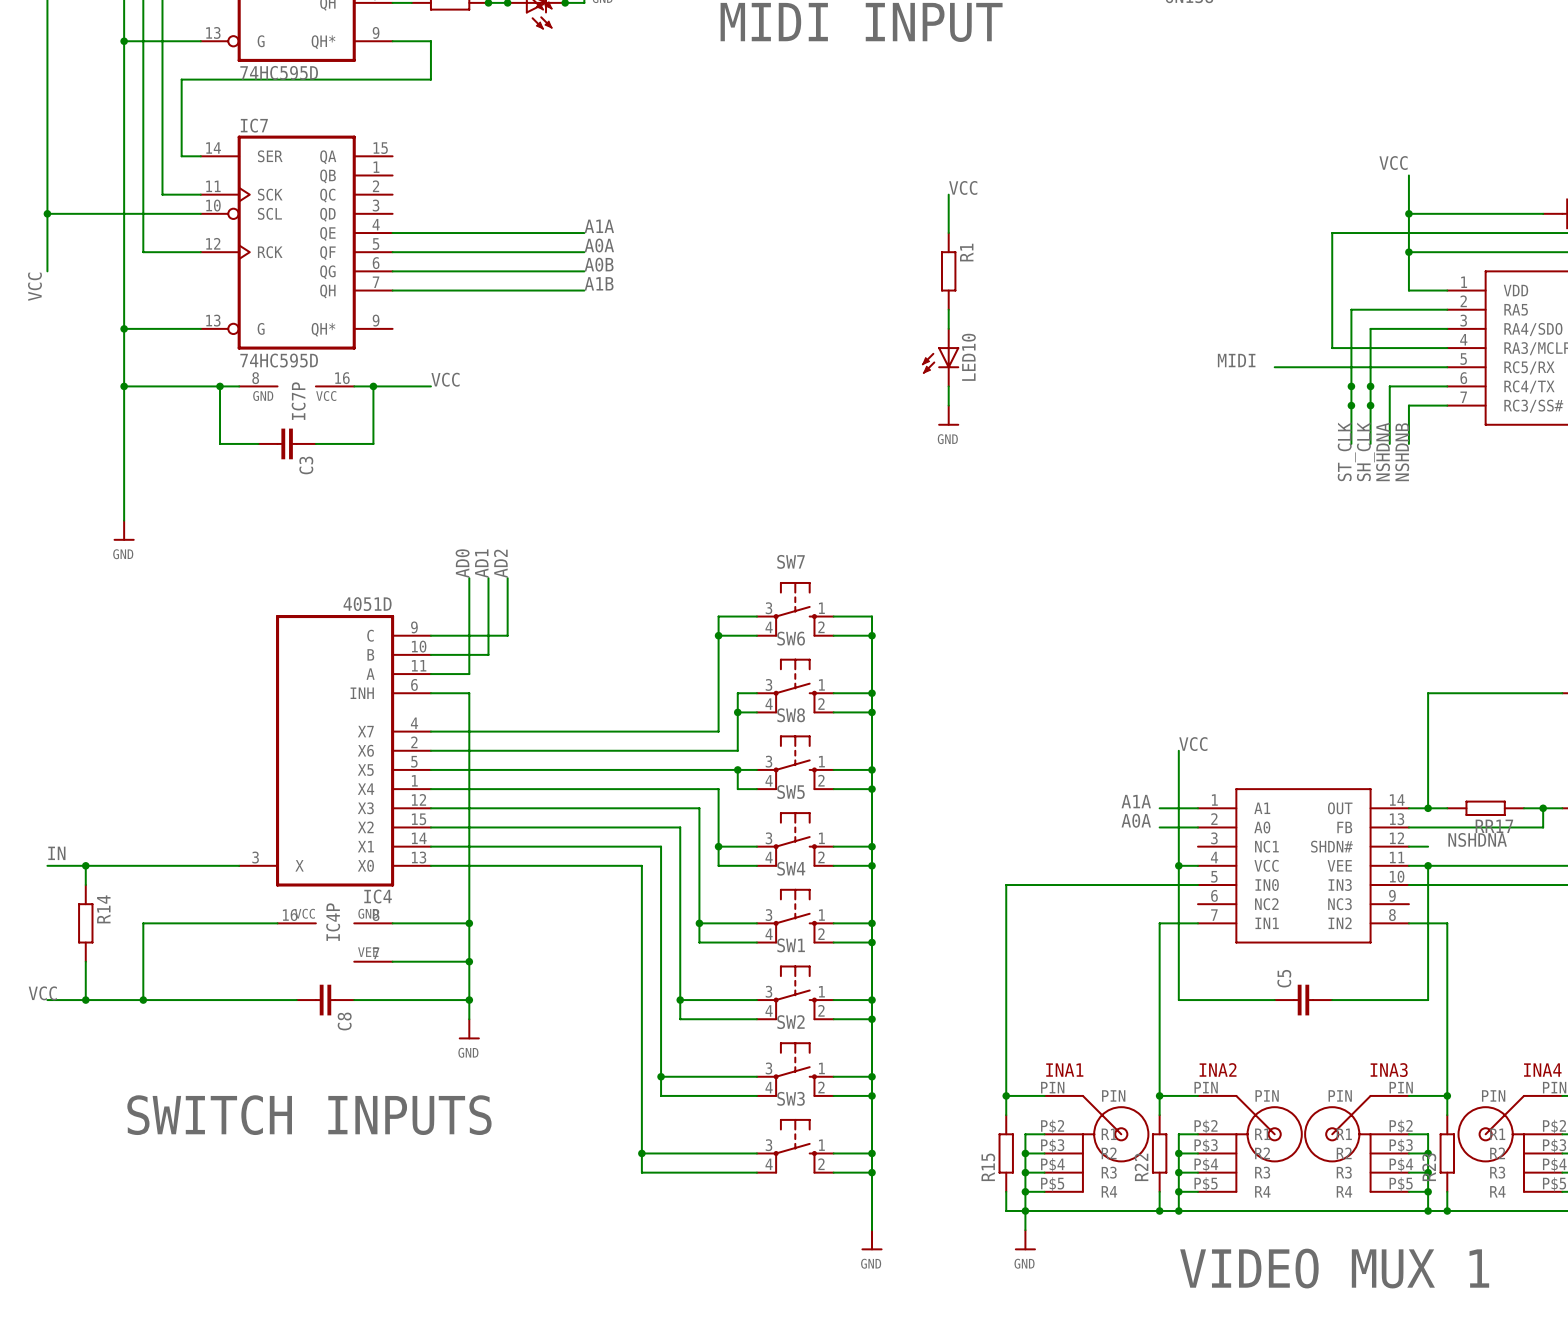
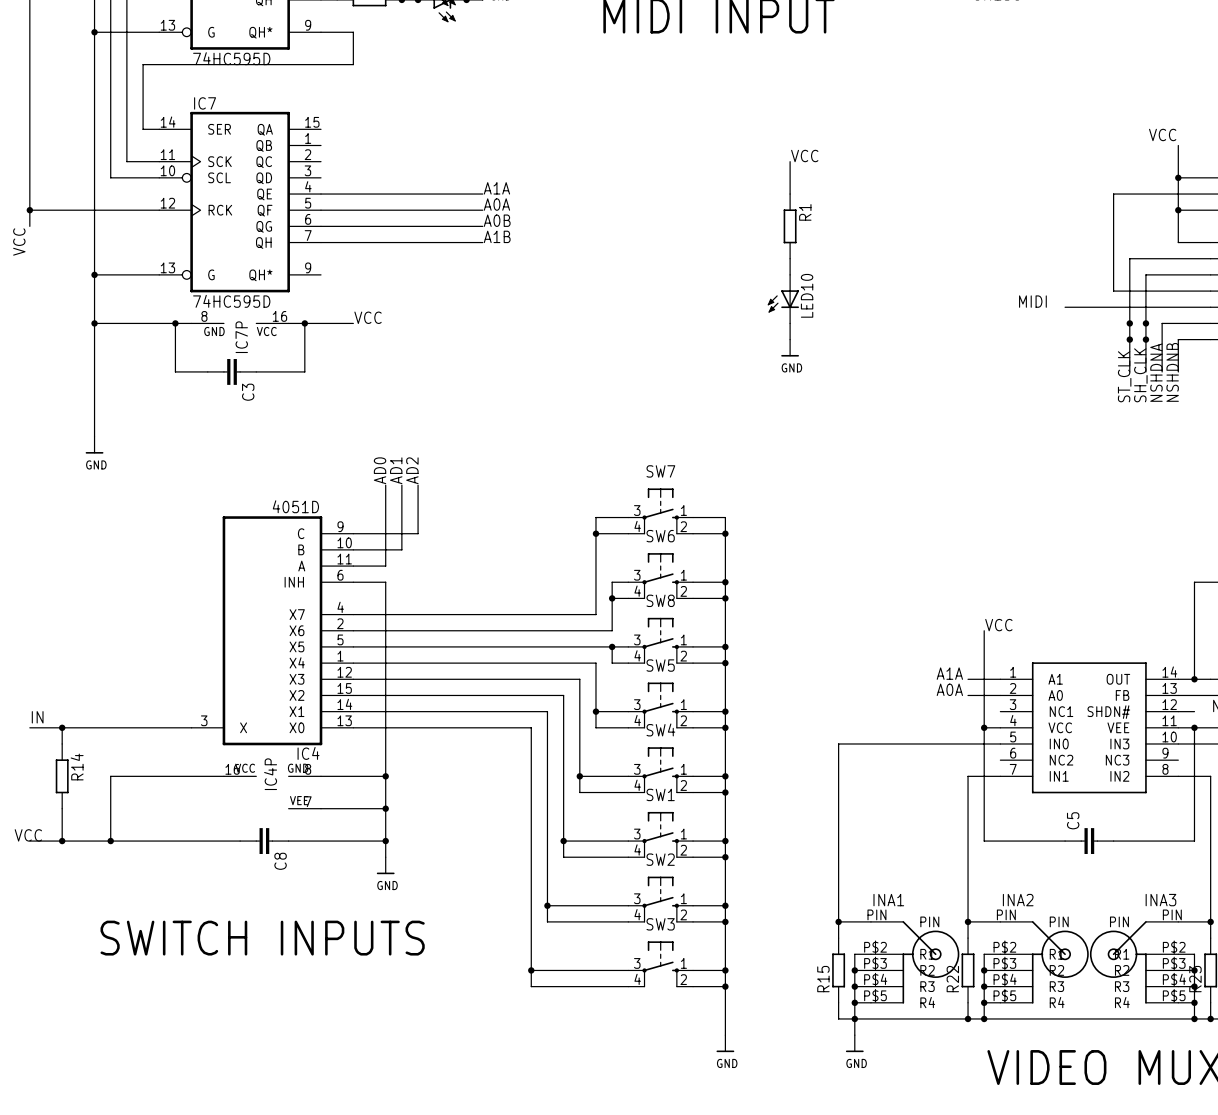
wire: (47, 213) (143, 213) (143, 252) -> (29, 210) (110, 210)
junction position: (47, 213) -> (29, 210)

